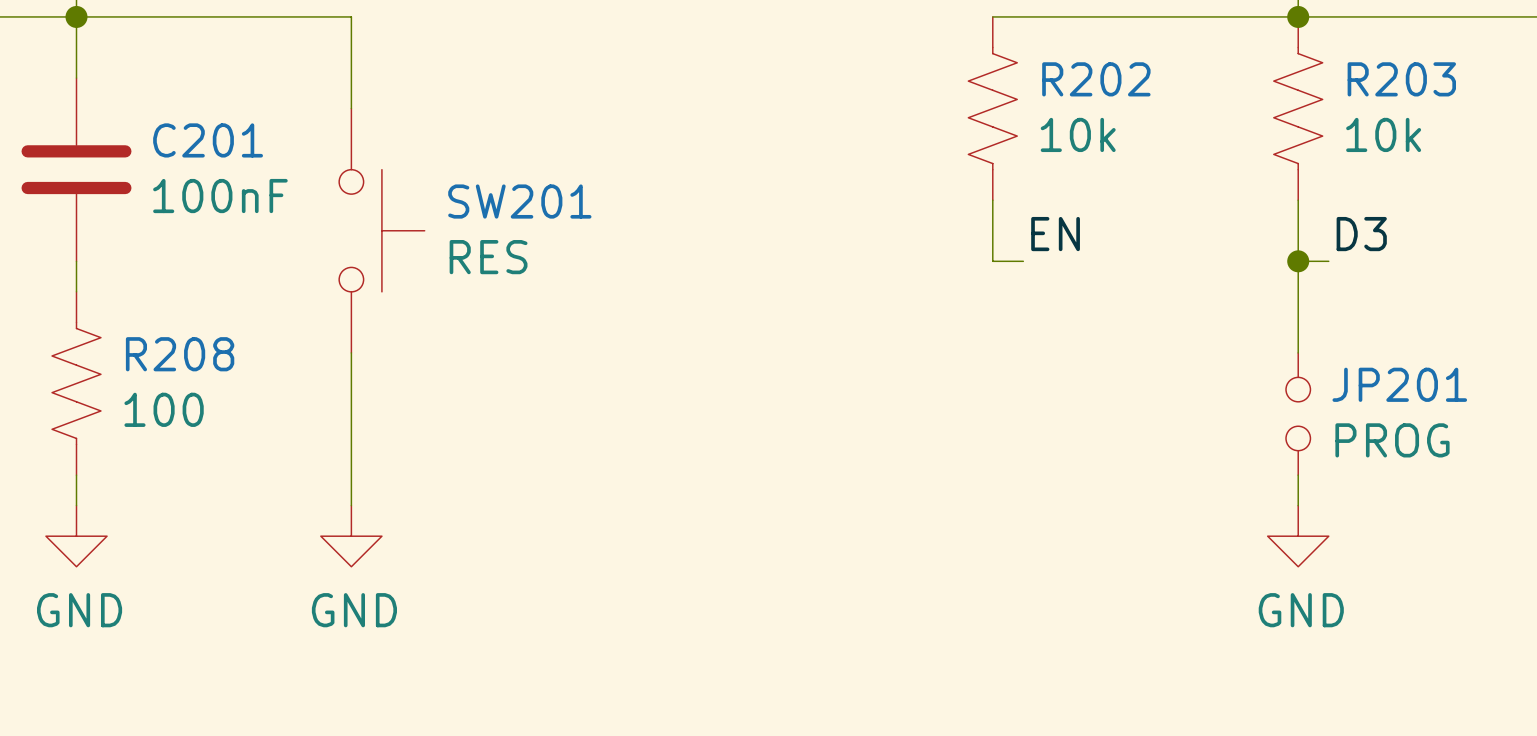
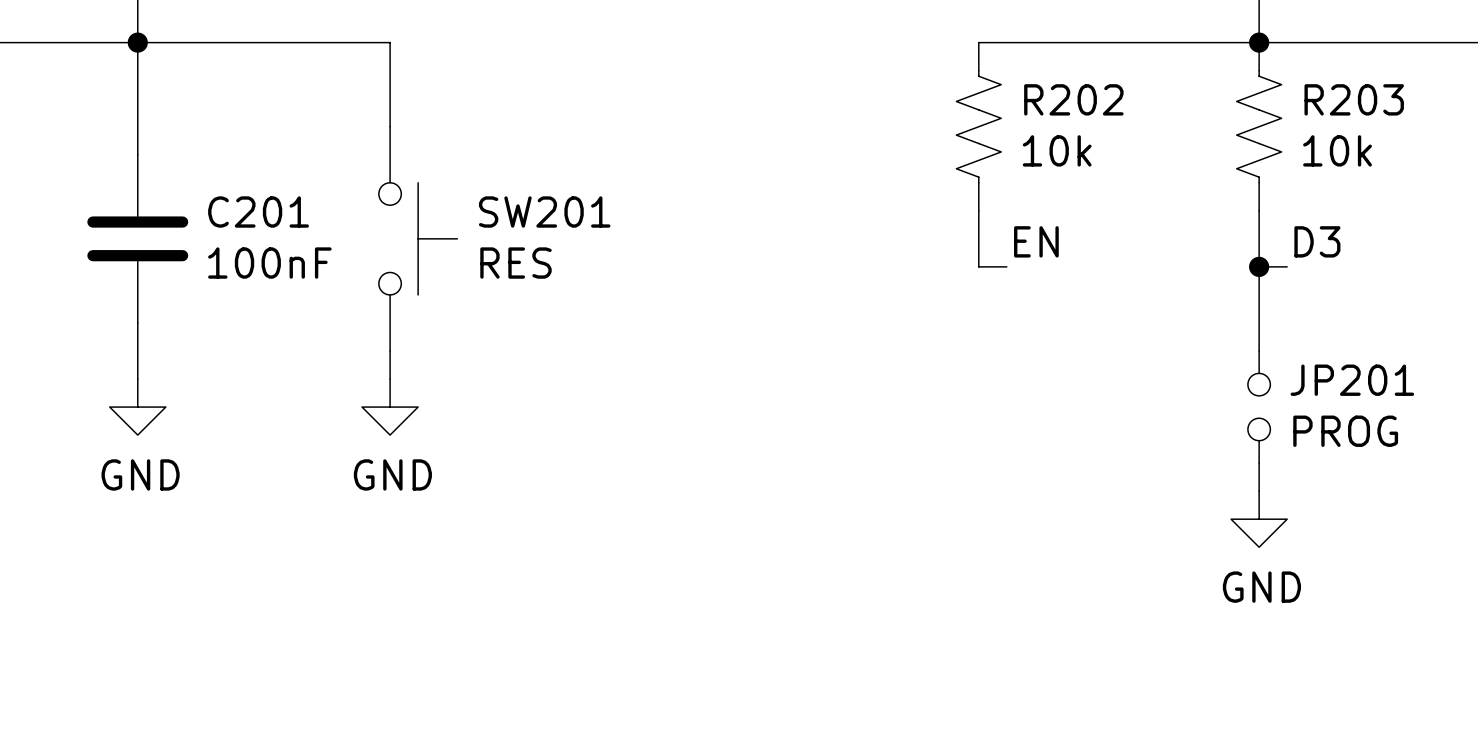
C201 position: (76, 169) -> (137, 238)
wire: none -> (137, 322) (137, 379)
R208: 100 (76, 383) -> none
wire: (351, 383) (351, 505) -> none
wire: (76, 475) (76, 505) -> none
power symbol position: GND (76, 536) -> GND (137, 407)
power symbol position: GND (351, 536) -> GND (390, 407)

